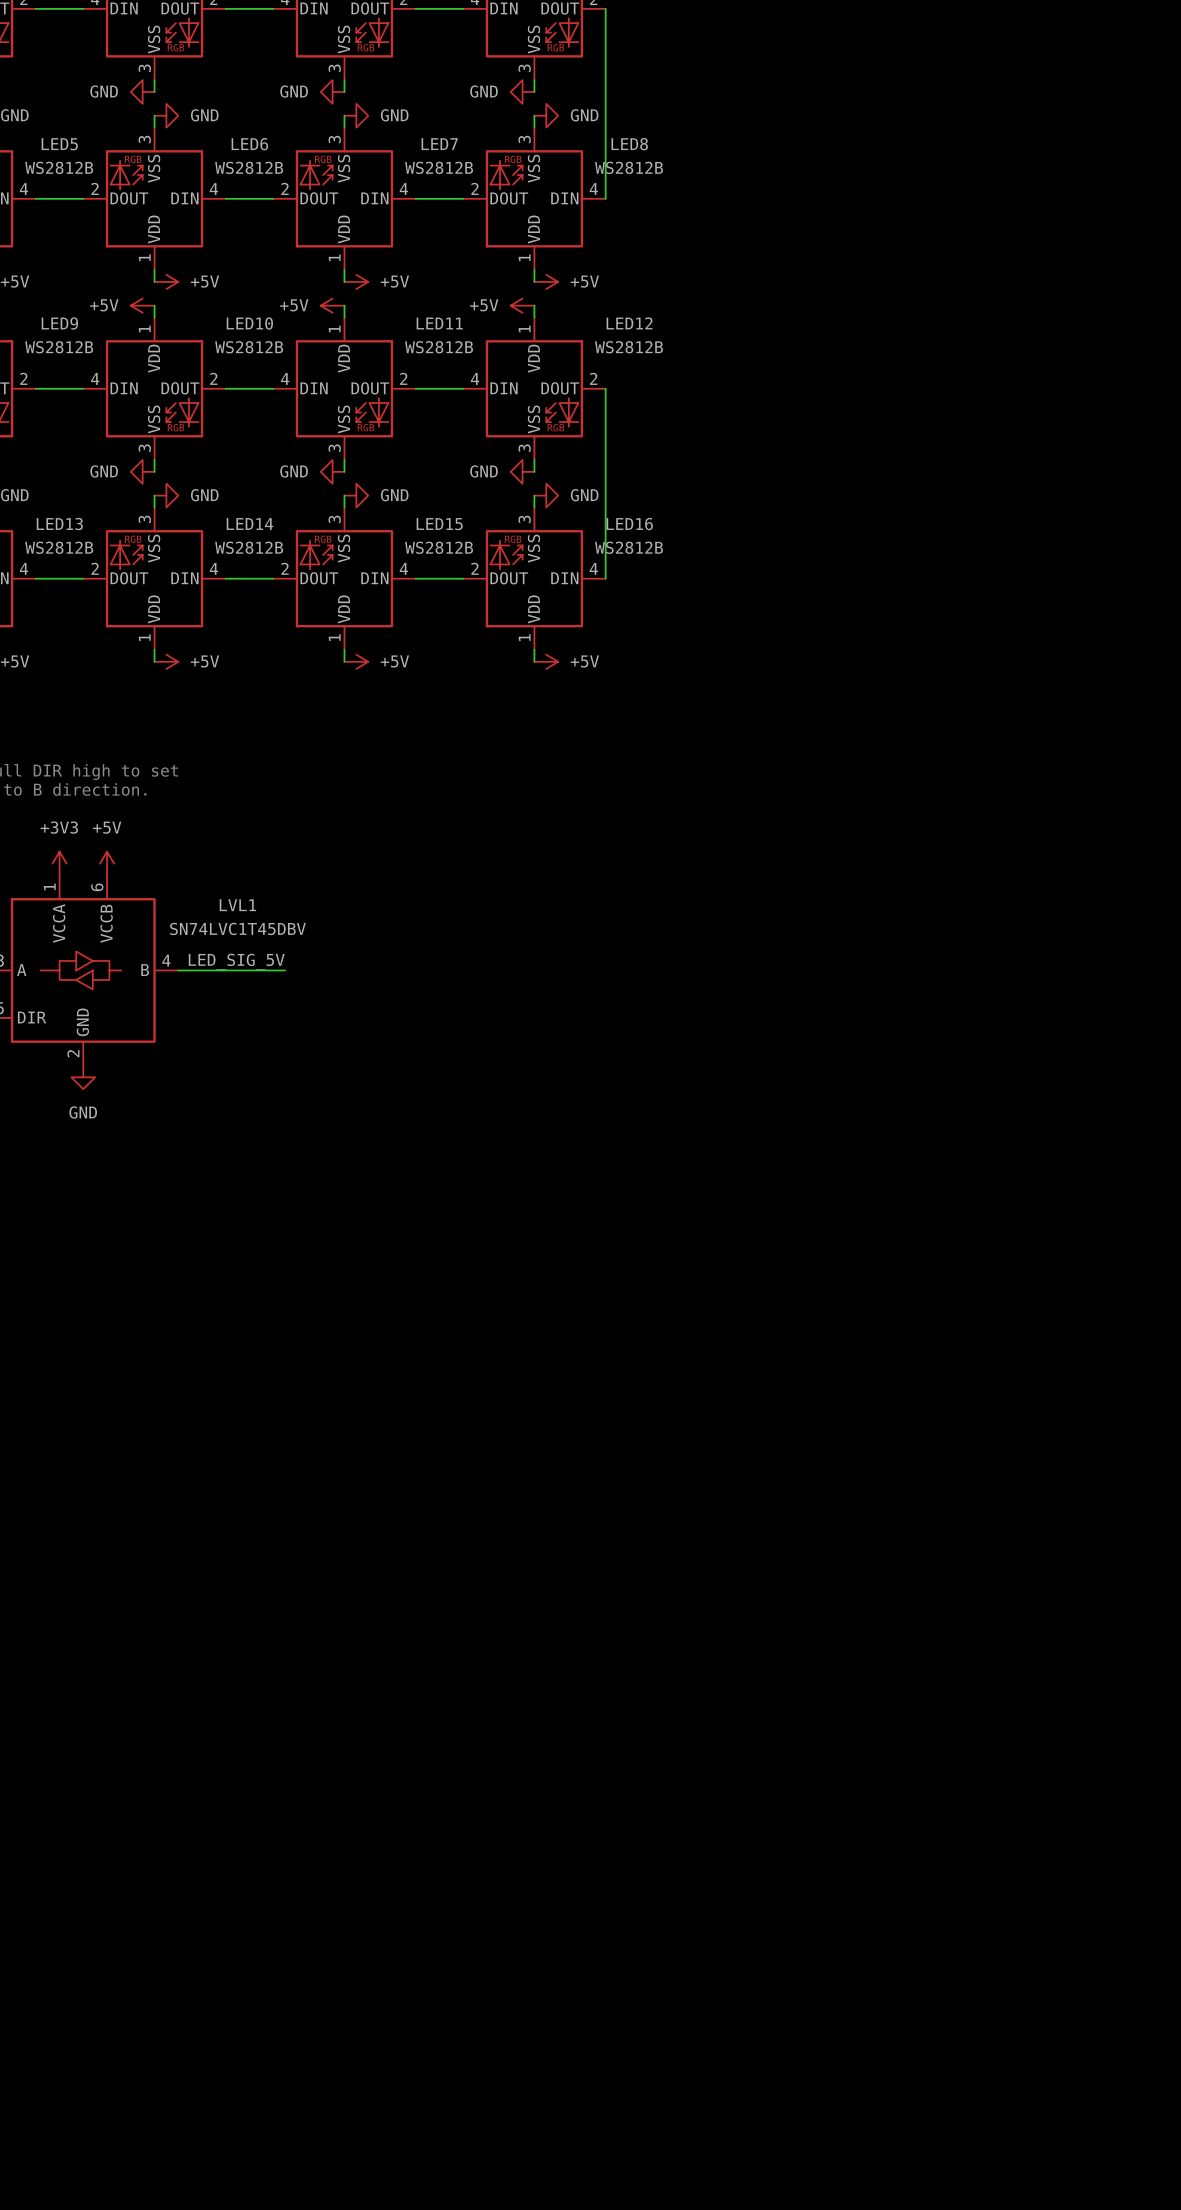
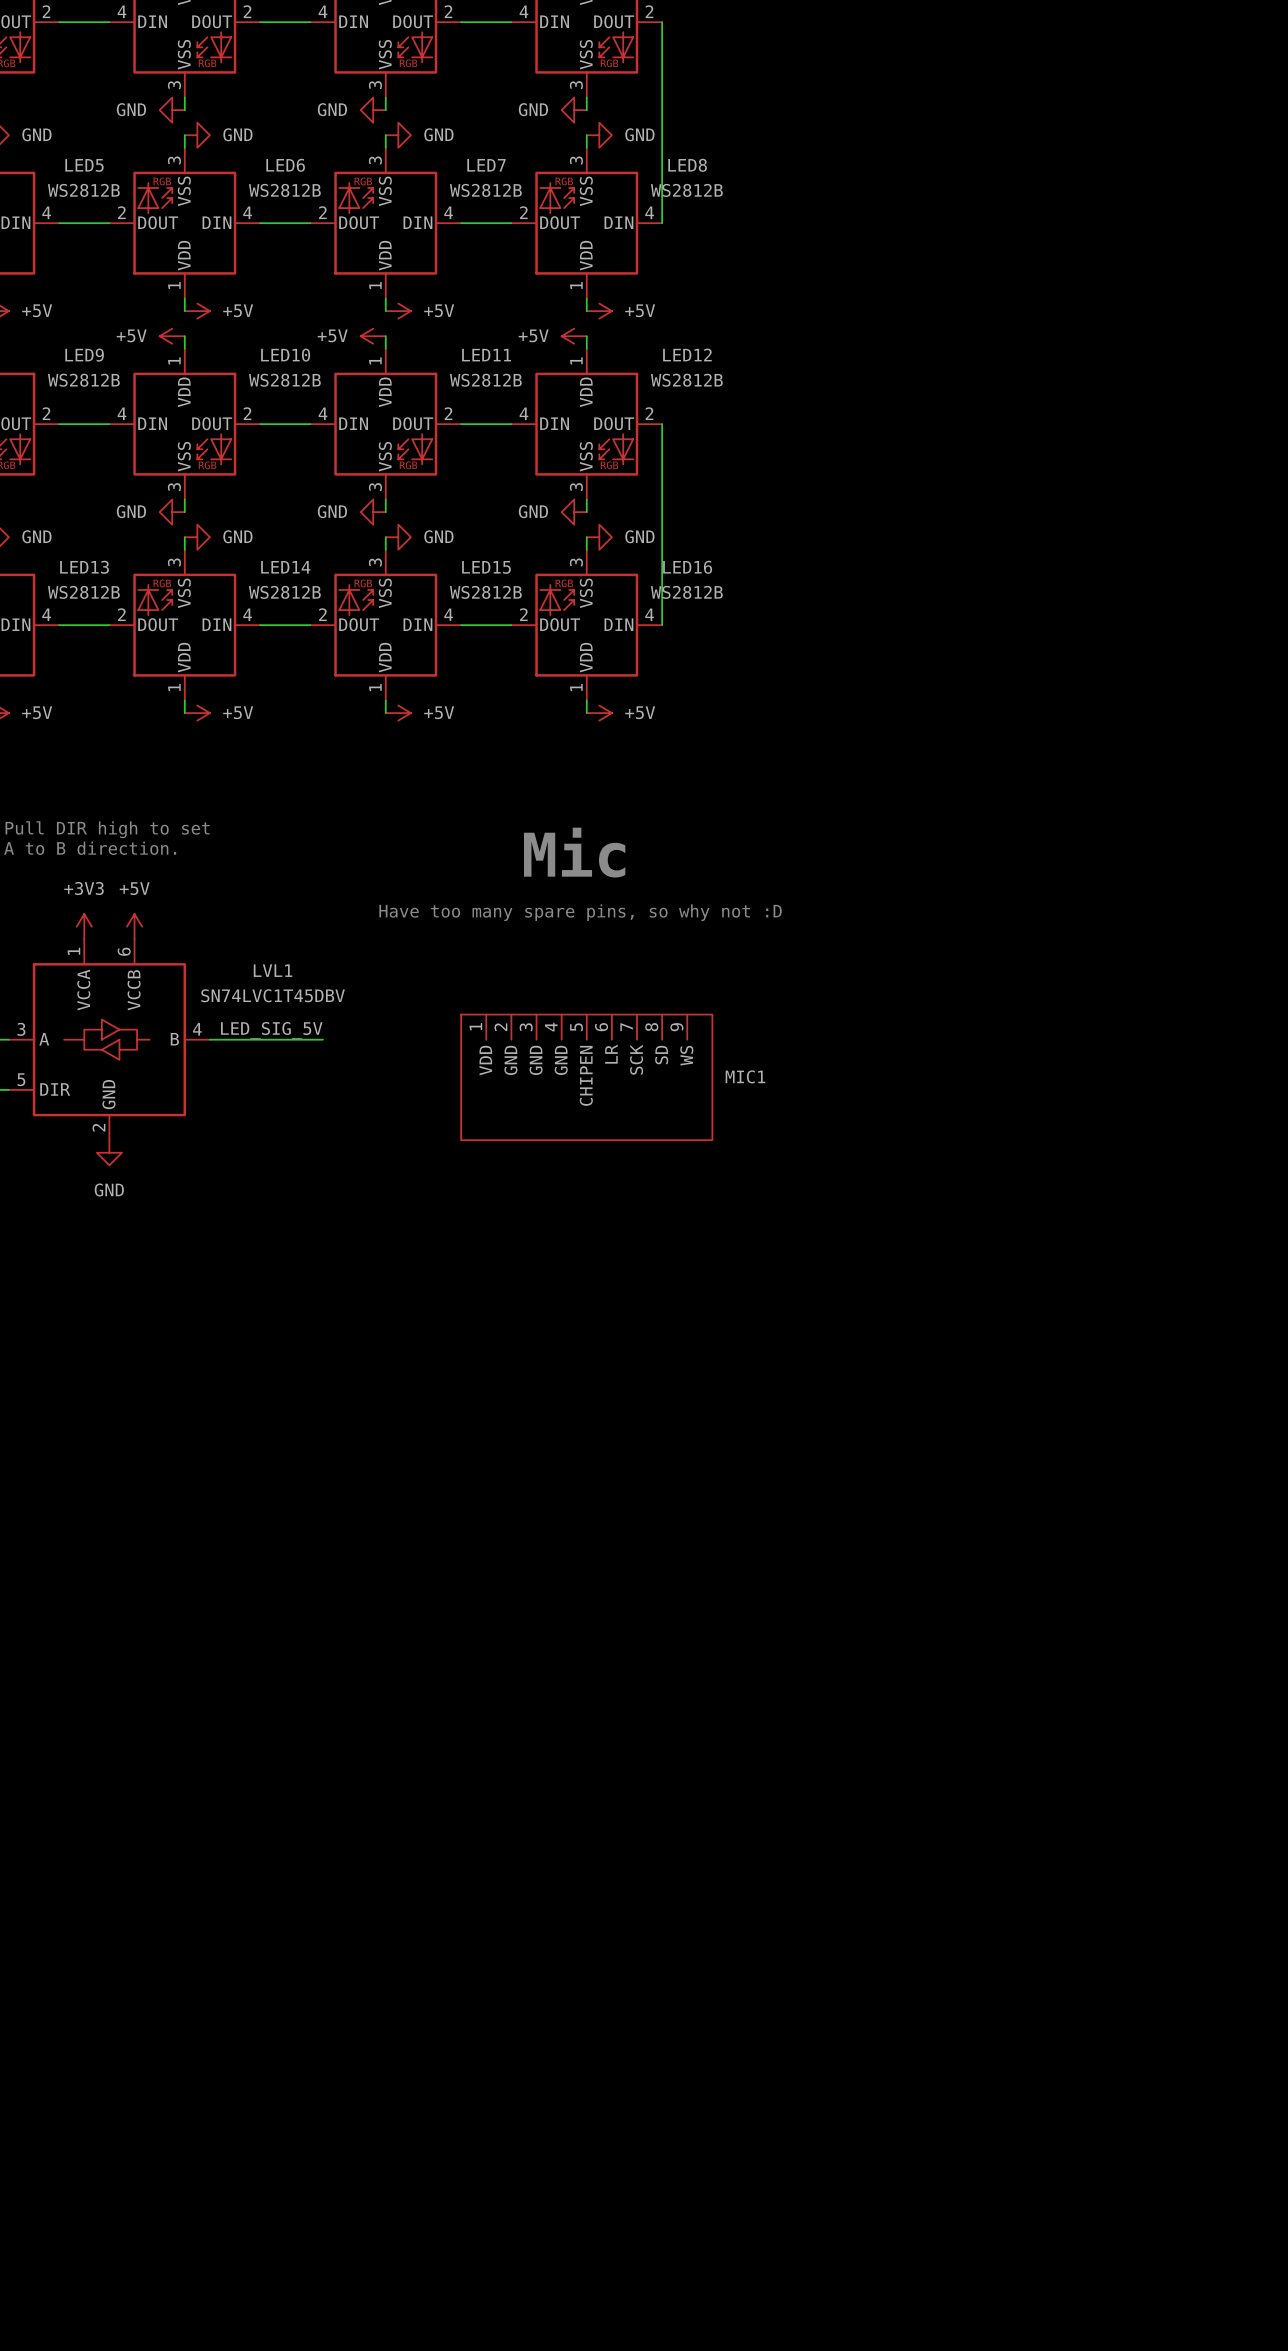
text: none -> Mic (574, 852)
text: none -> Have too many spare pins, so why not :D (580, 912)
MIC1: none -> (586, 1077)

